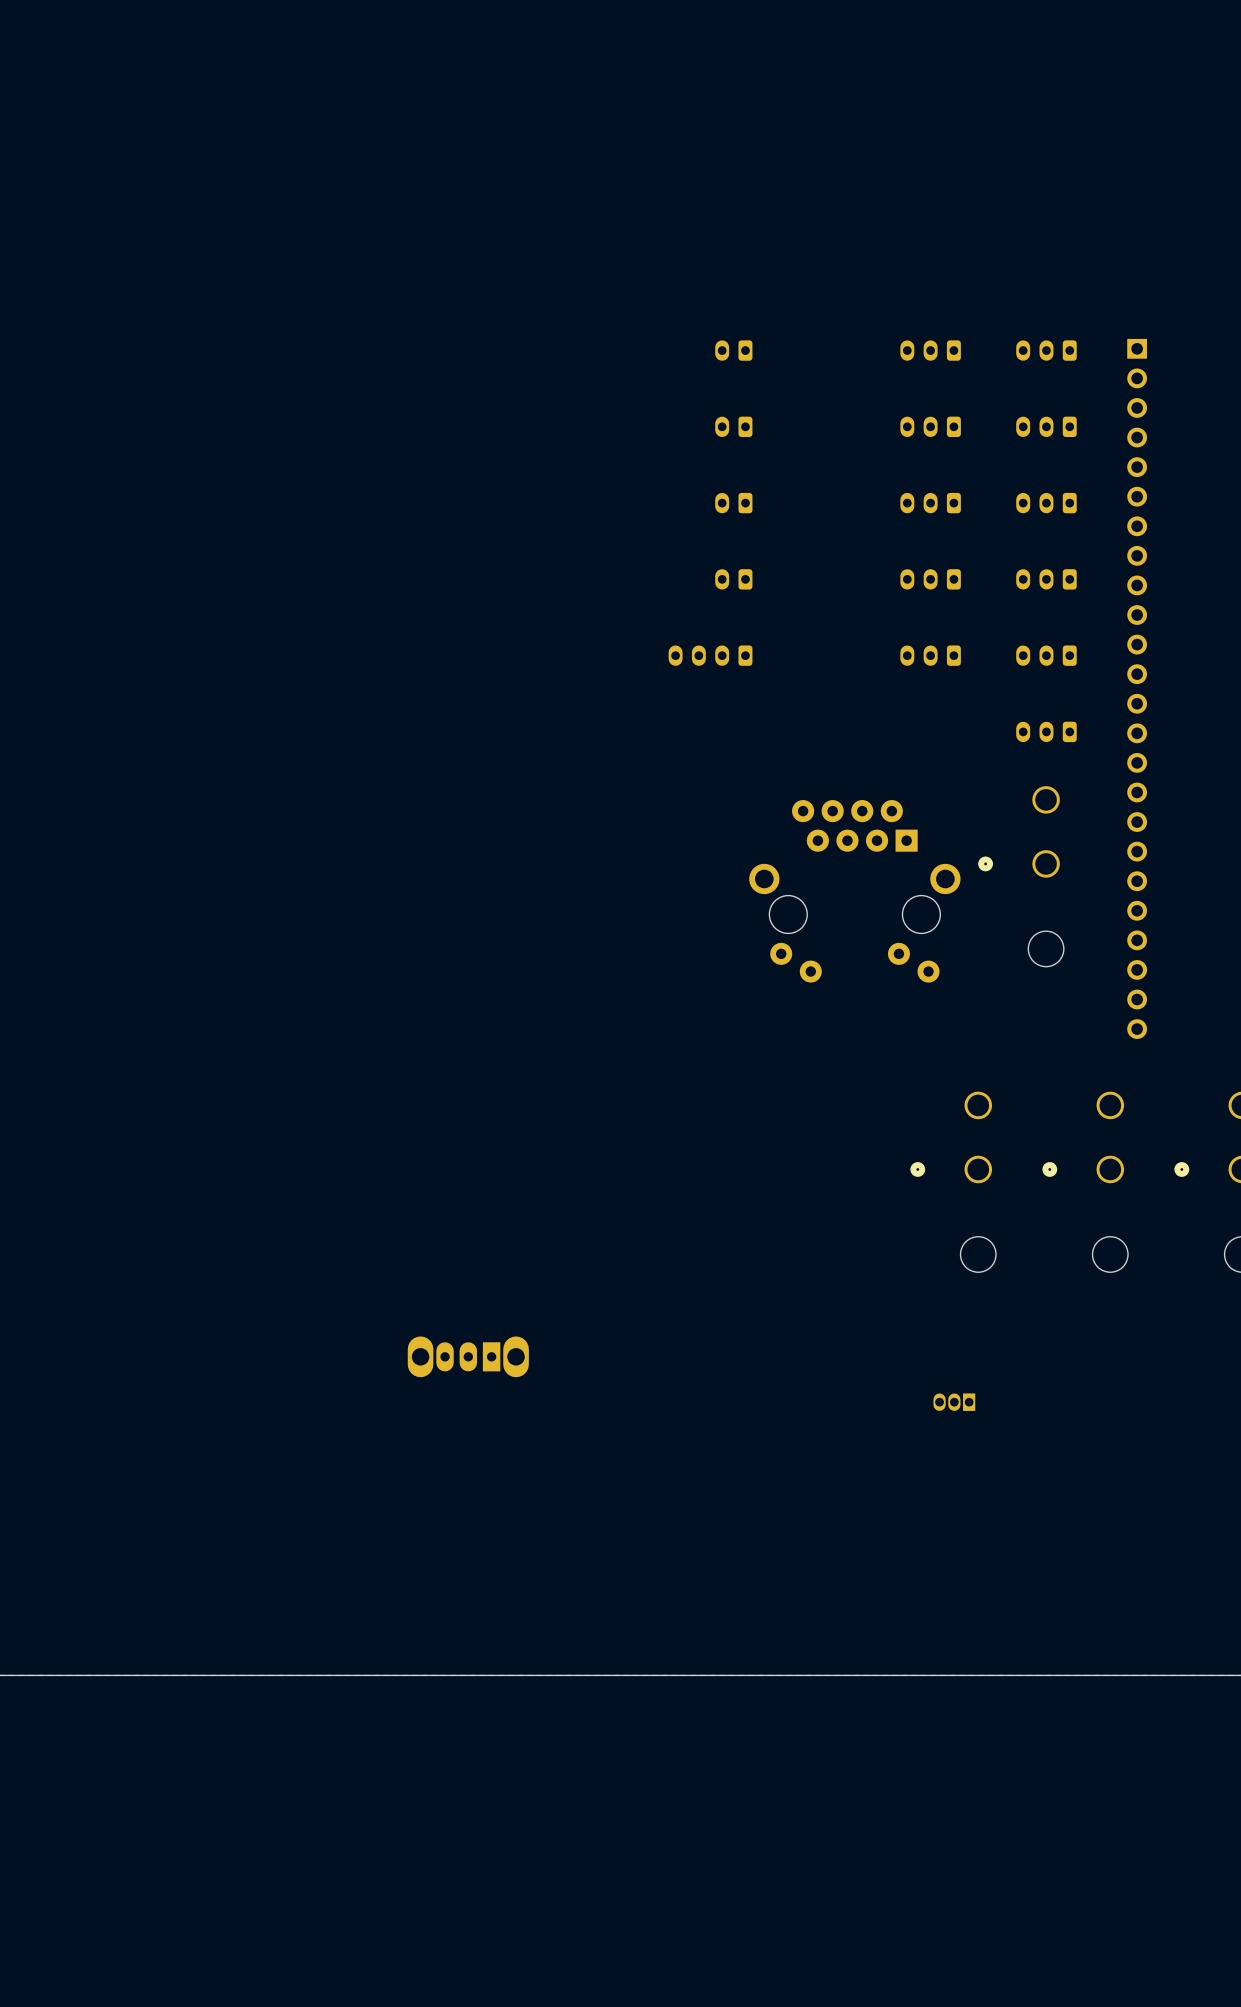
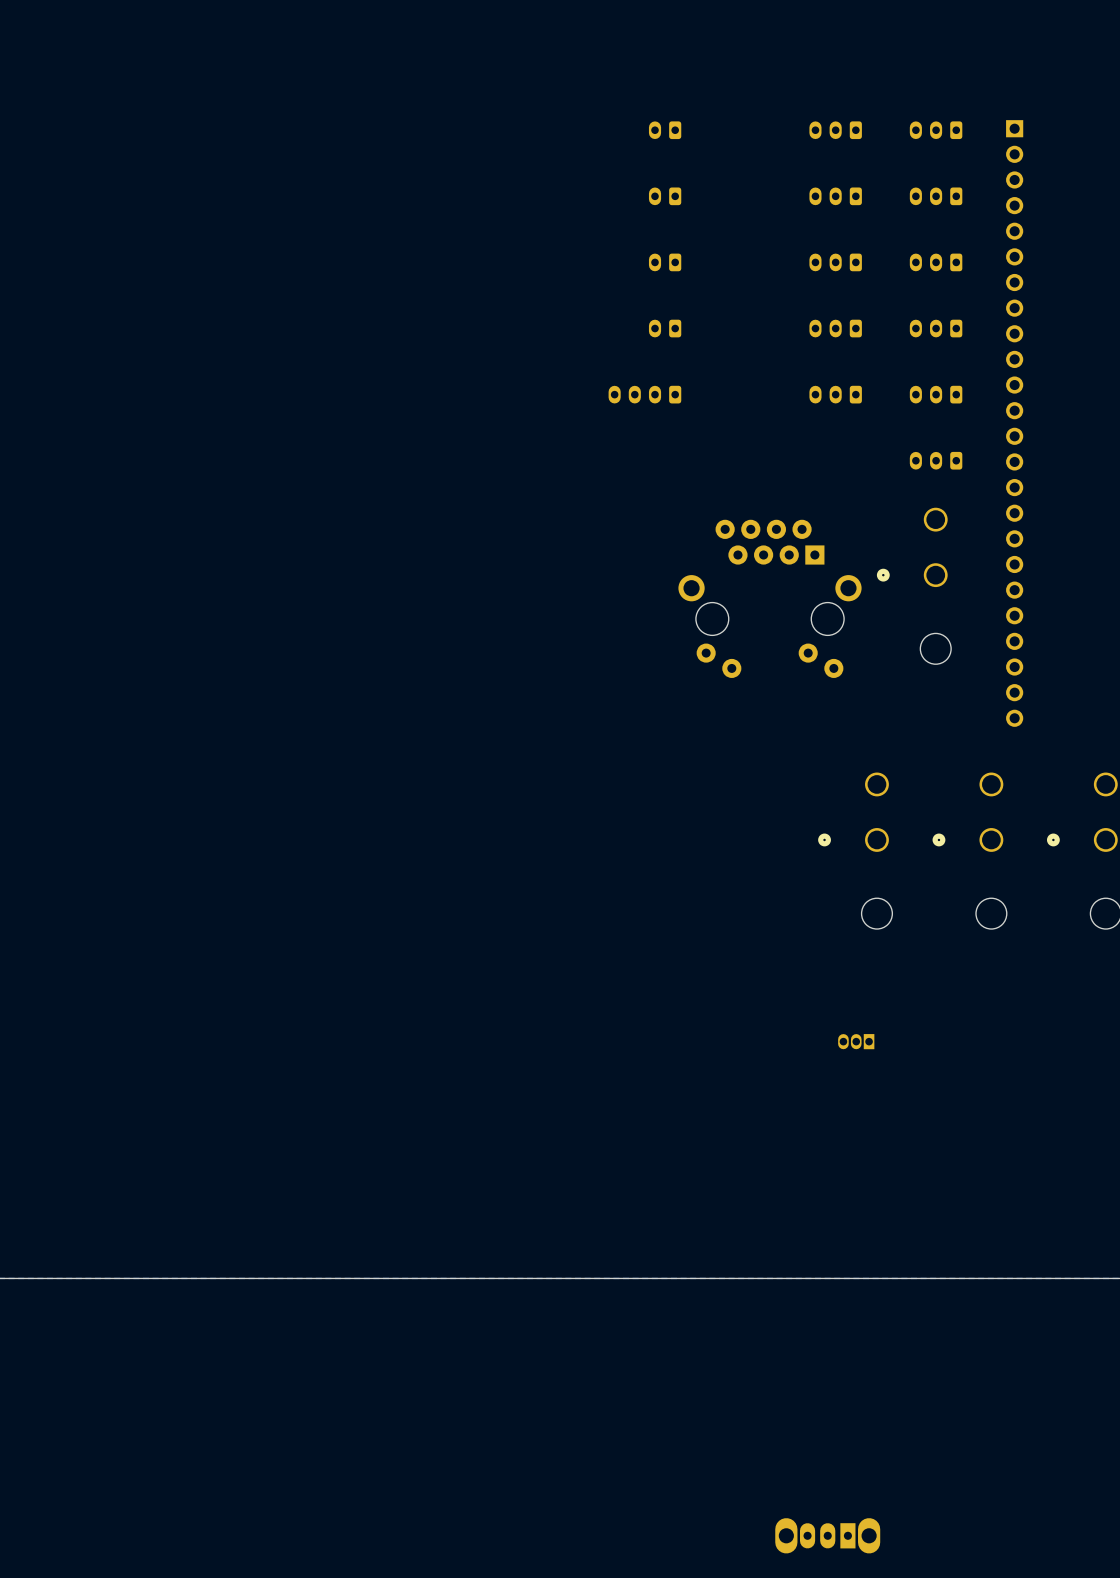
part: (468, 1356) -> none
part: none -> (827, 1535)

